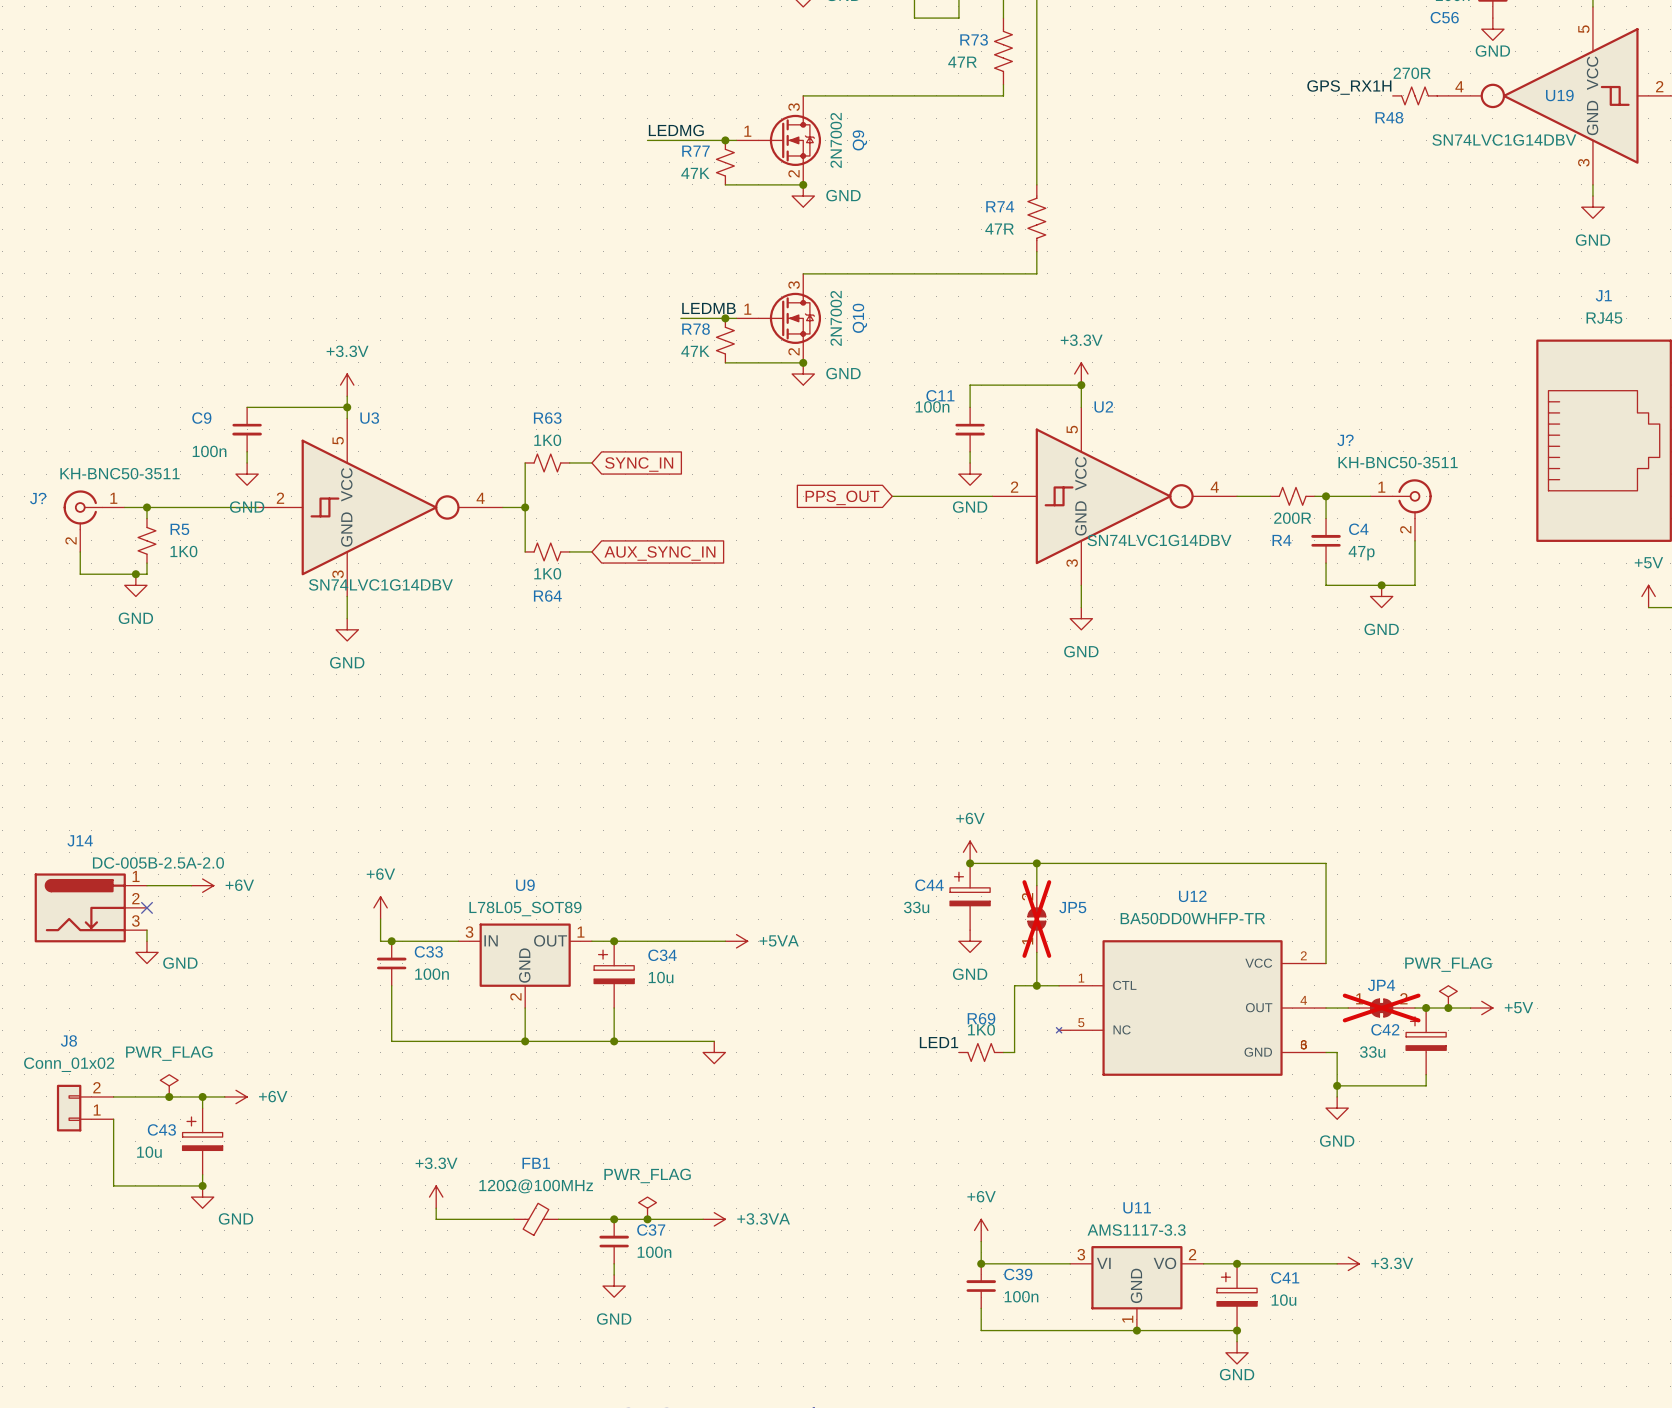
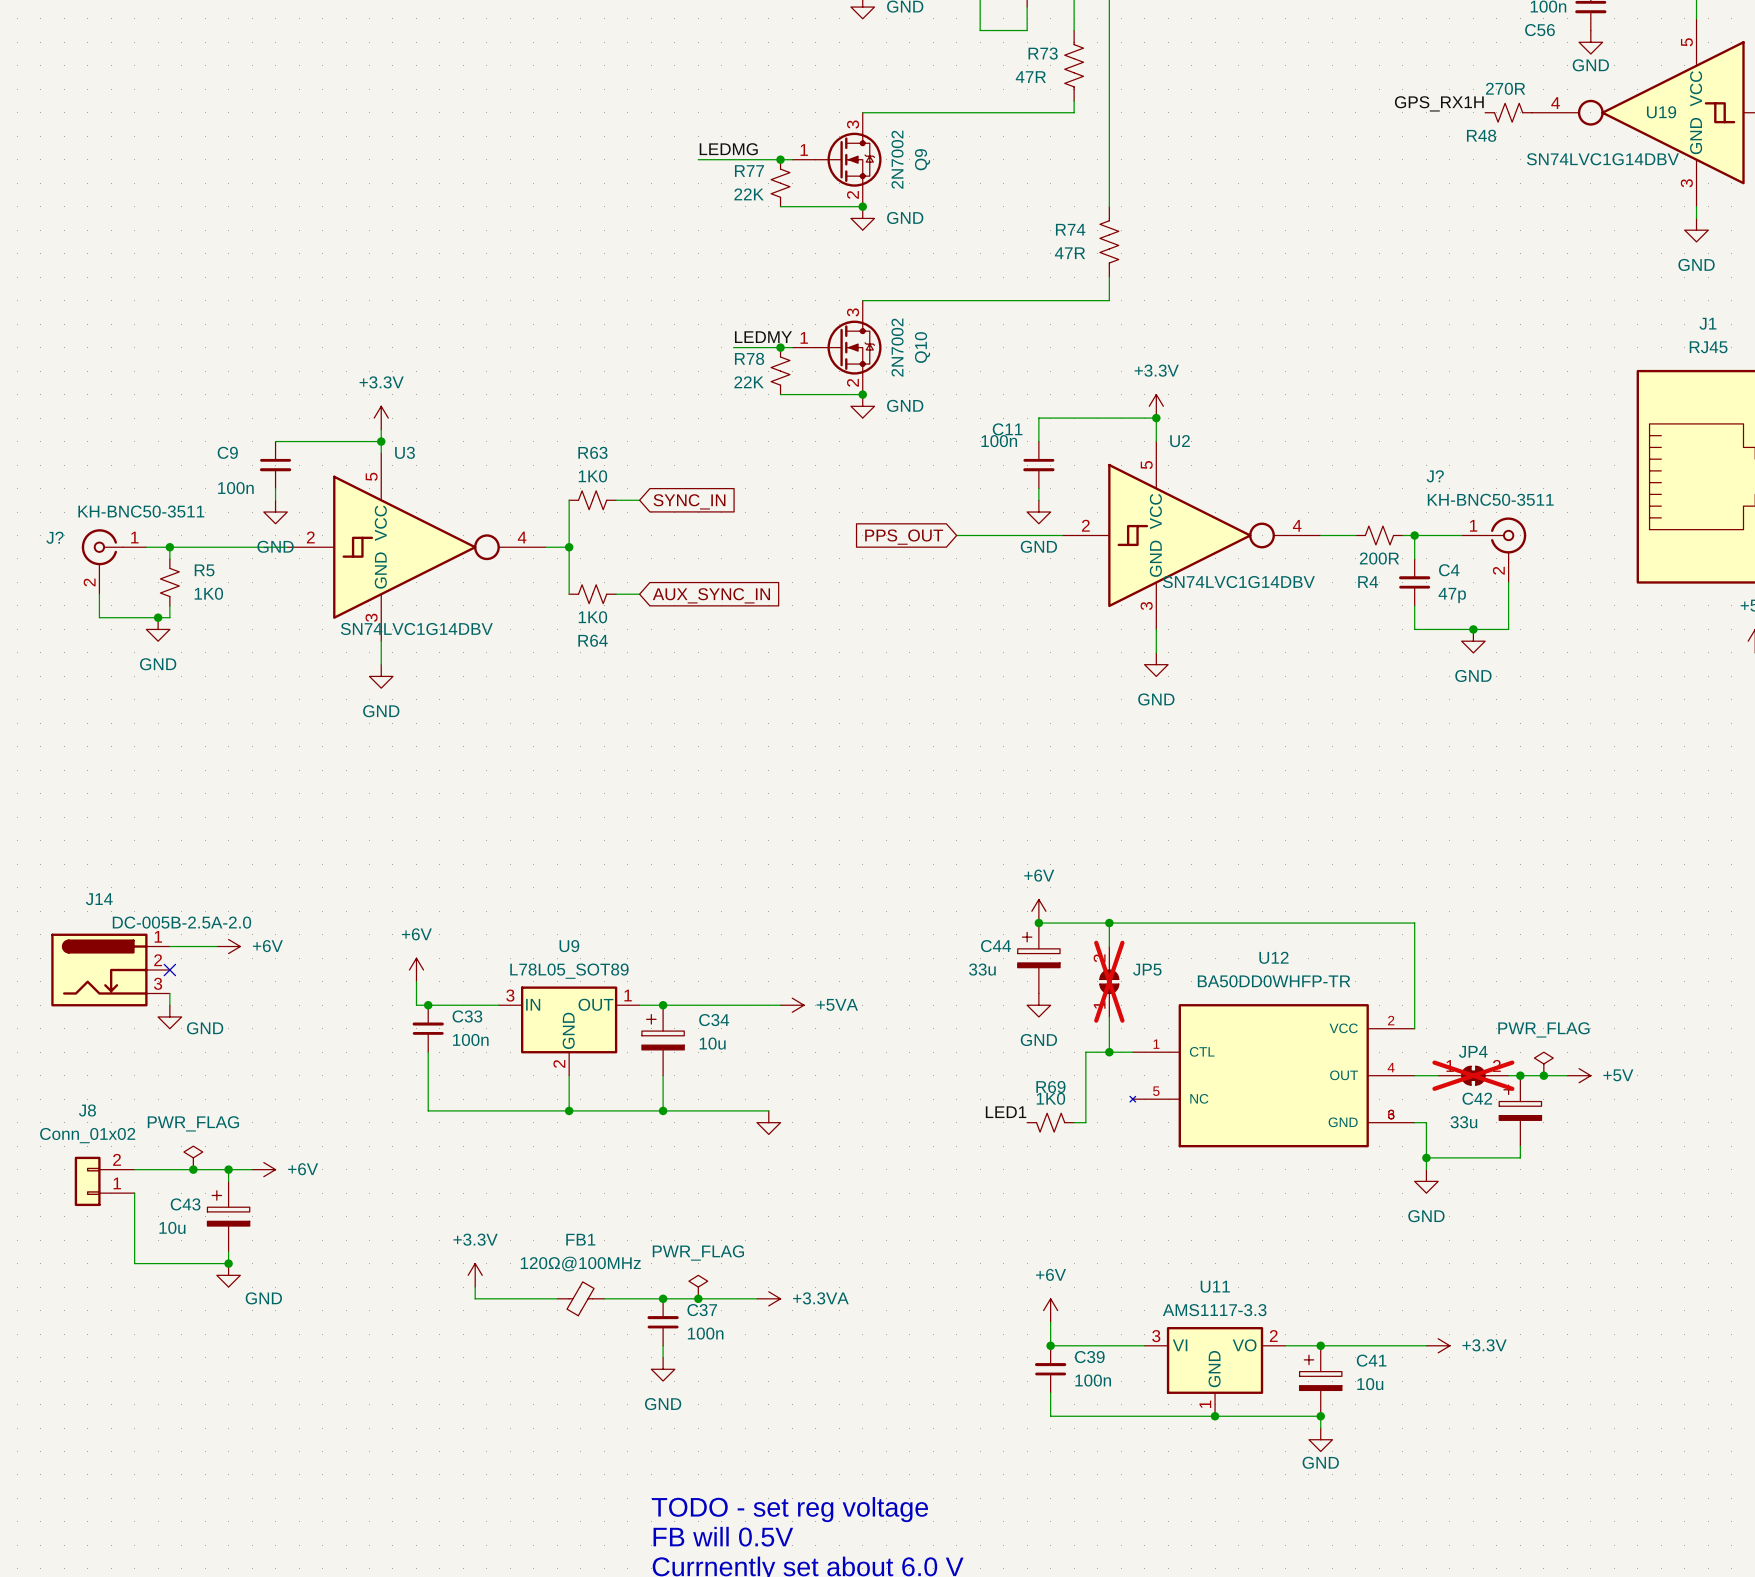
R77 value: 47K (695, 173) -> 22K (749, 194)
label: LEDMB (708, 308) -> LEDMY (763, 337)
R78 value: 47K (695, 351) -> 22K (749, 382)

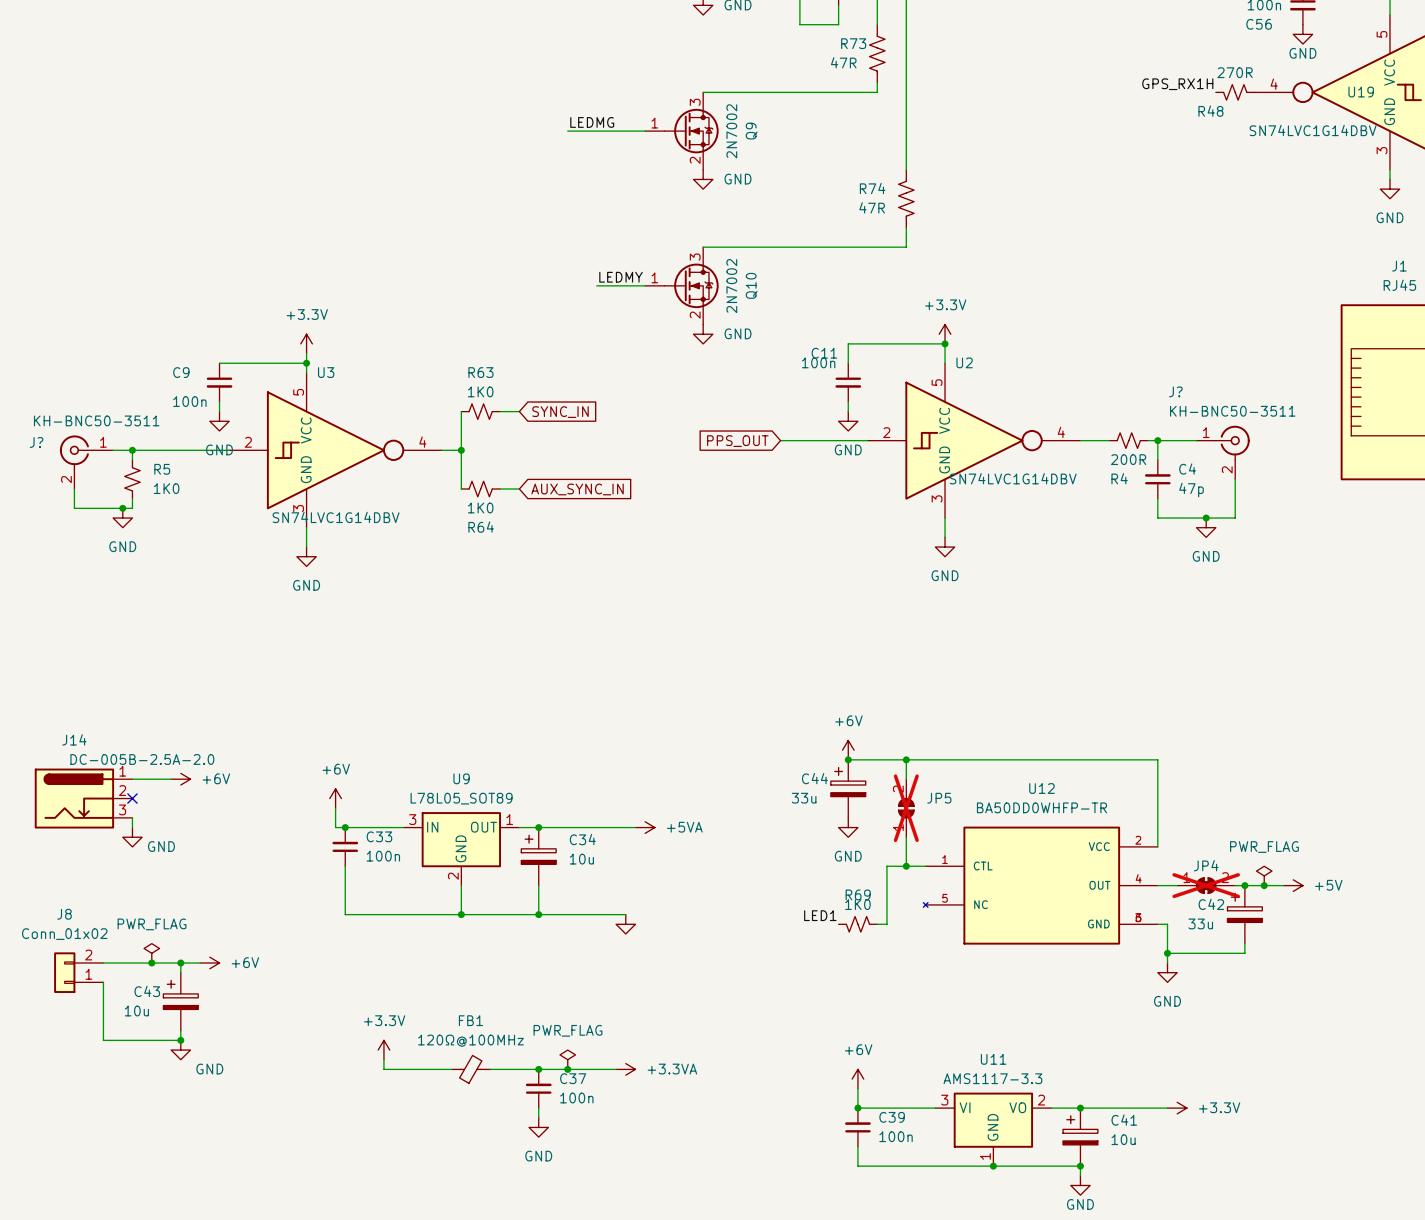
junction: (780, 159) -> none
R77: 22K (780, 183) -> none
wire: (780, 206) (862, 206) -> none
junction: (862, 206) -> none
junction: (780, 347) -> none
R78: 22K (780, 371) -> none
wire: (780, 394) (862, 394) -> none
junction: (862, 394) -> none

